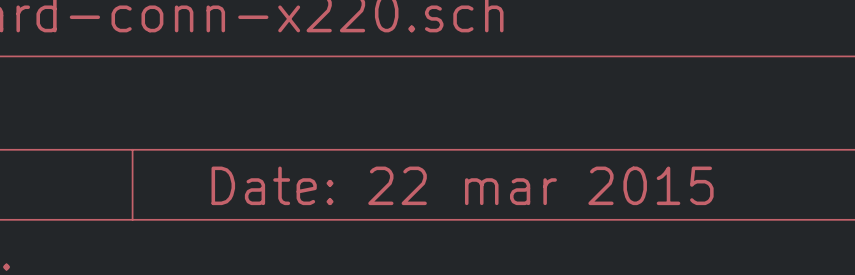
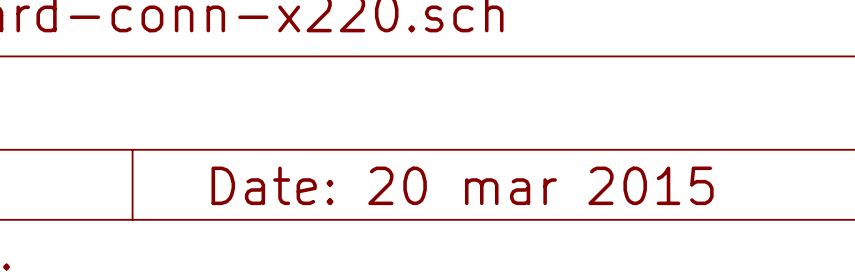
title block: Date: 22 mar 2015 (462, 185) -> Date: 20 mar 2015 (462, 185)

